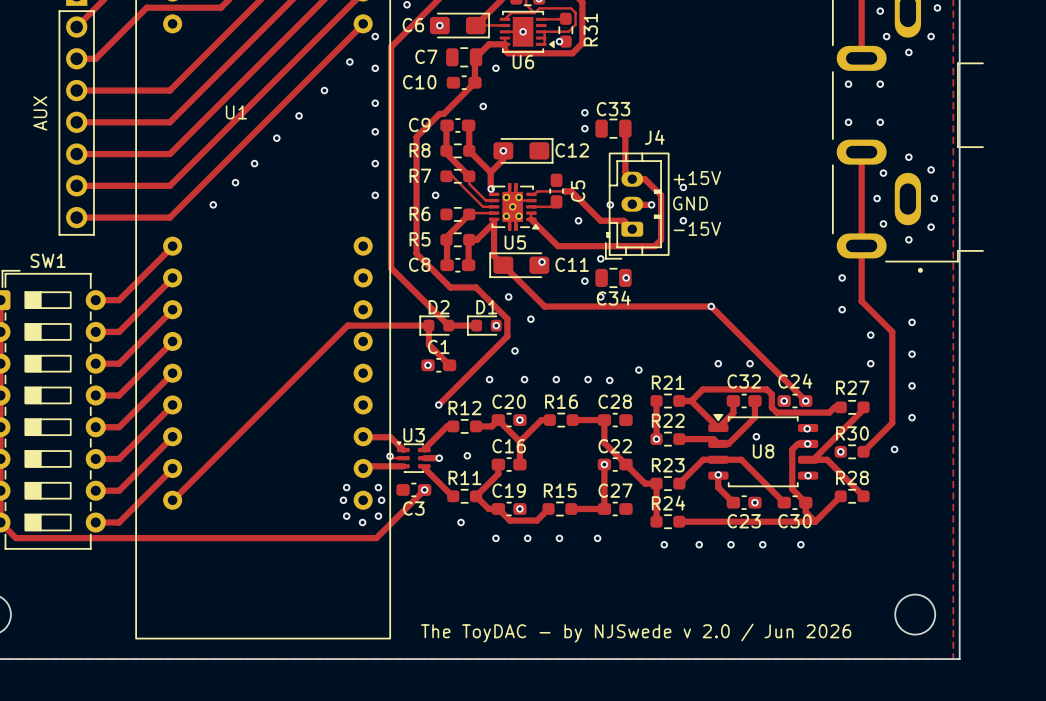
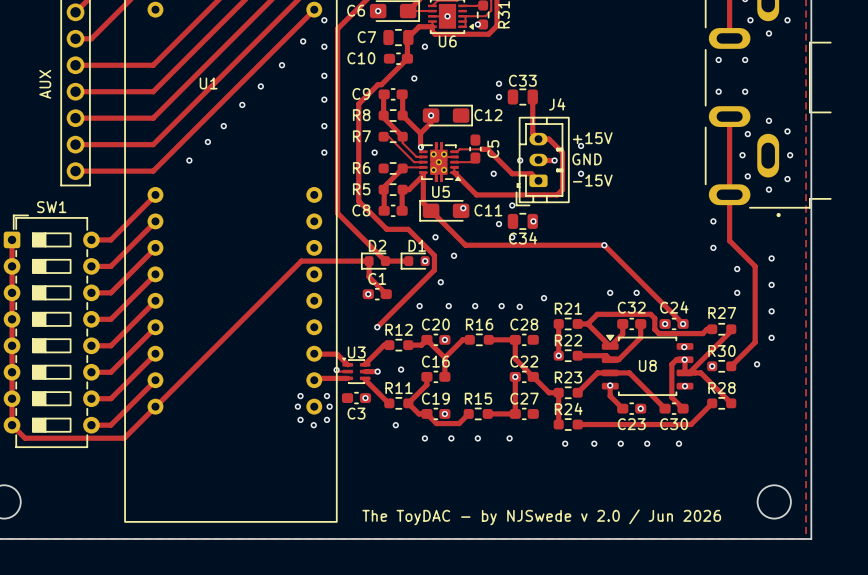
via: (756, 436) -> none
track: none -> (684, 359) (684, 372)
track: (424, 489) (376, 538) (135, 538) -> (155, 407) (124, 438)
track: (805, 502) (805, 512) (815, 521) -> none

